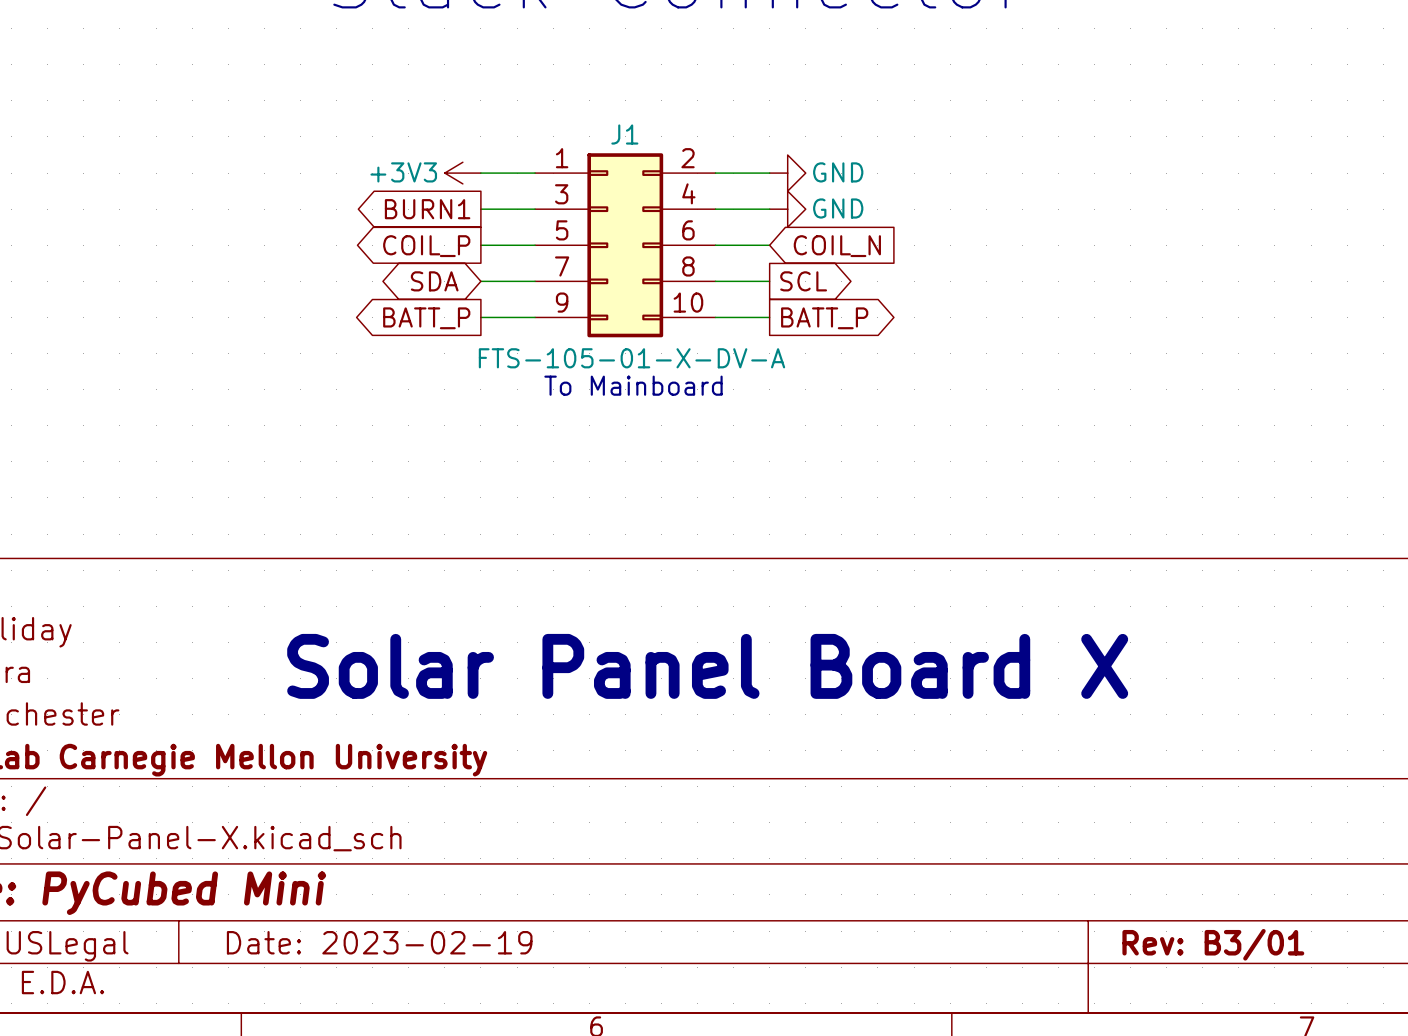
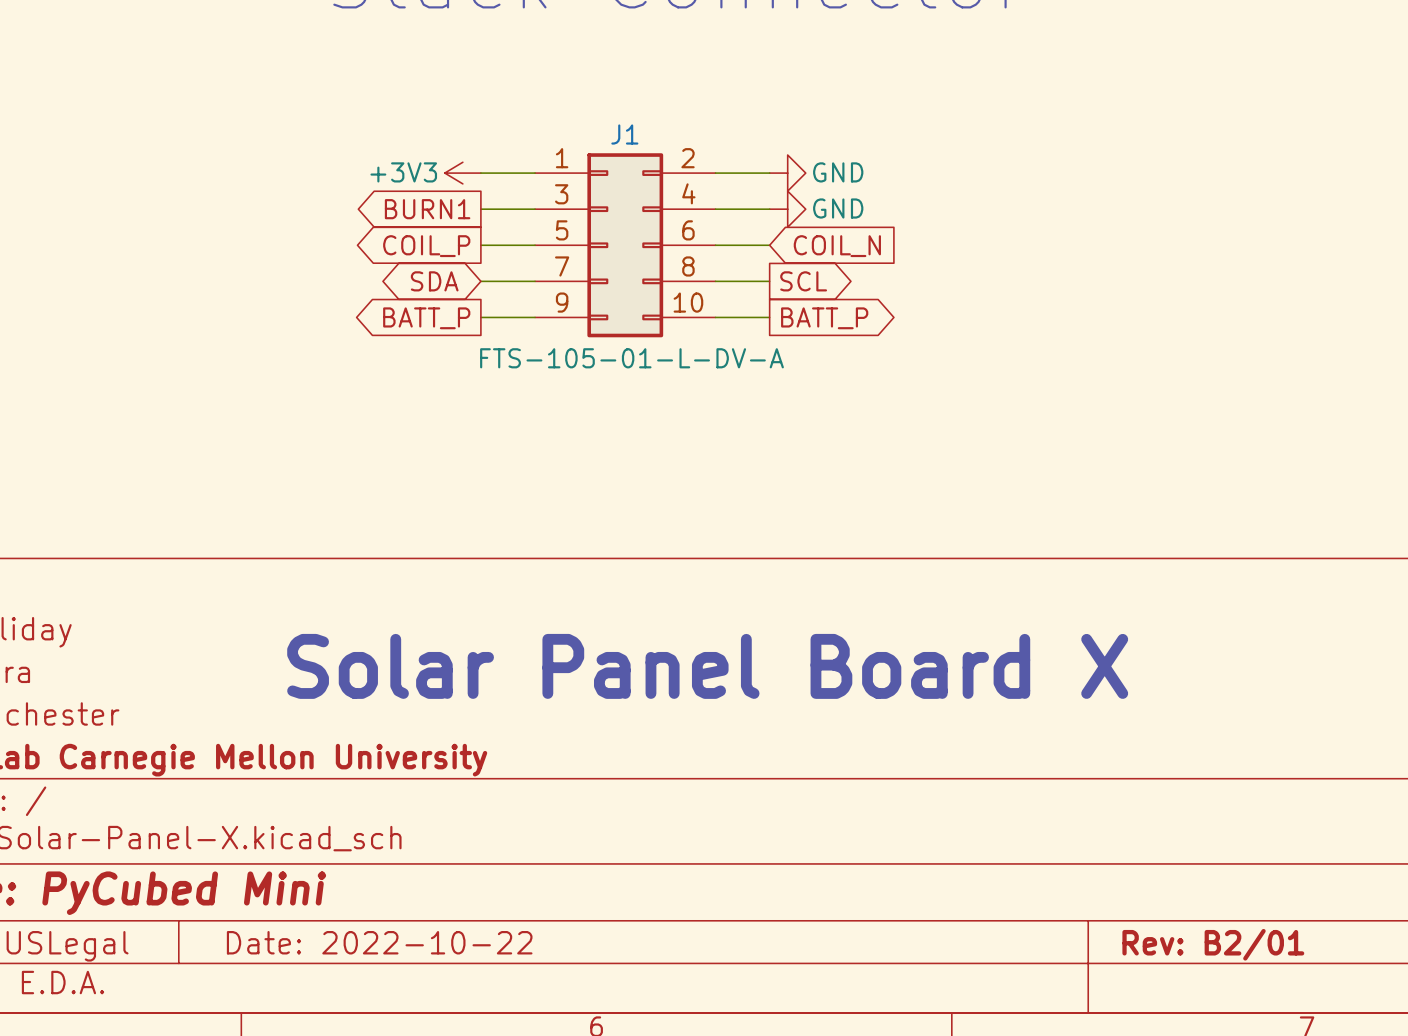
J1 value: FTS-105-01-X-DV-A (631, 358) -> FTS-105-01-L-DV-A (631, 358)
text: To Mainboard (633, 385) -> none
title block: Date: 2023-02-19 (379, 942) -> Date: 2022-10-22 (379, 942)
title block: Rev: B3/01 (1213, 944) -> Rev: B2/01 (1213, 944)

